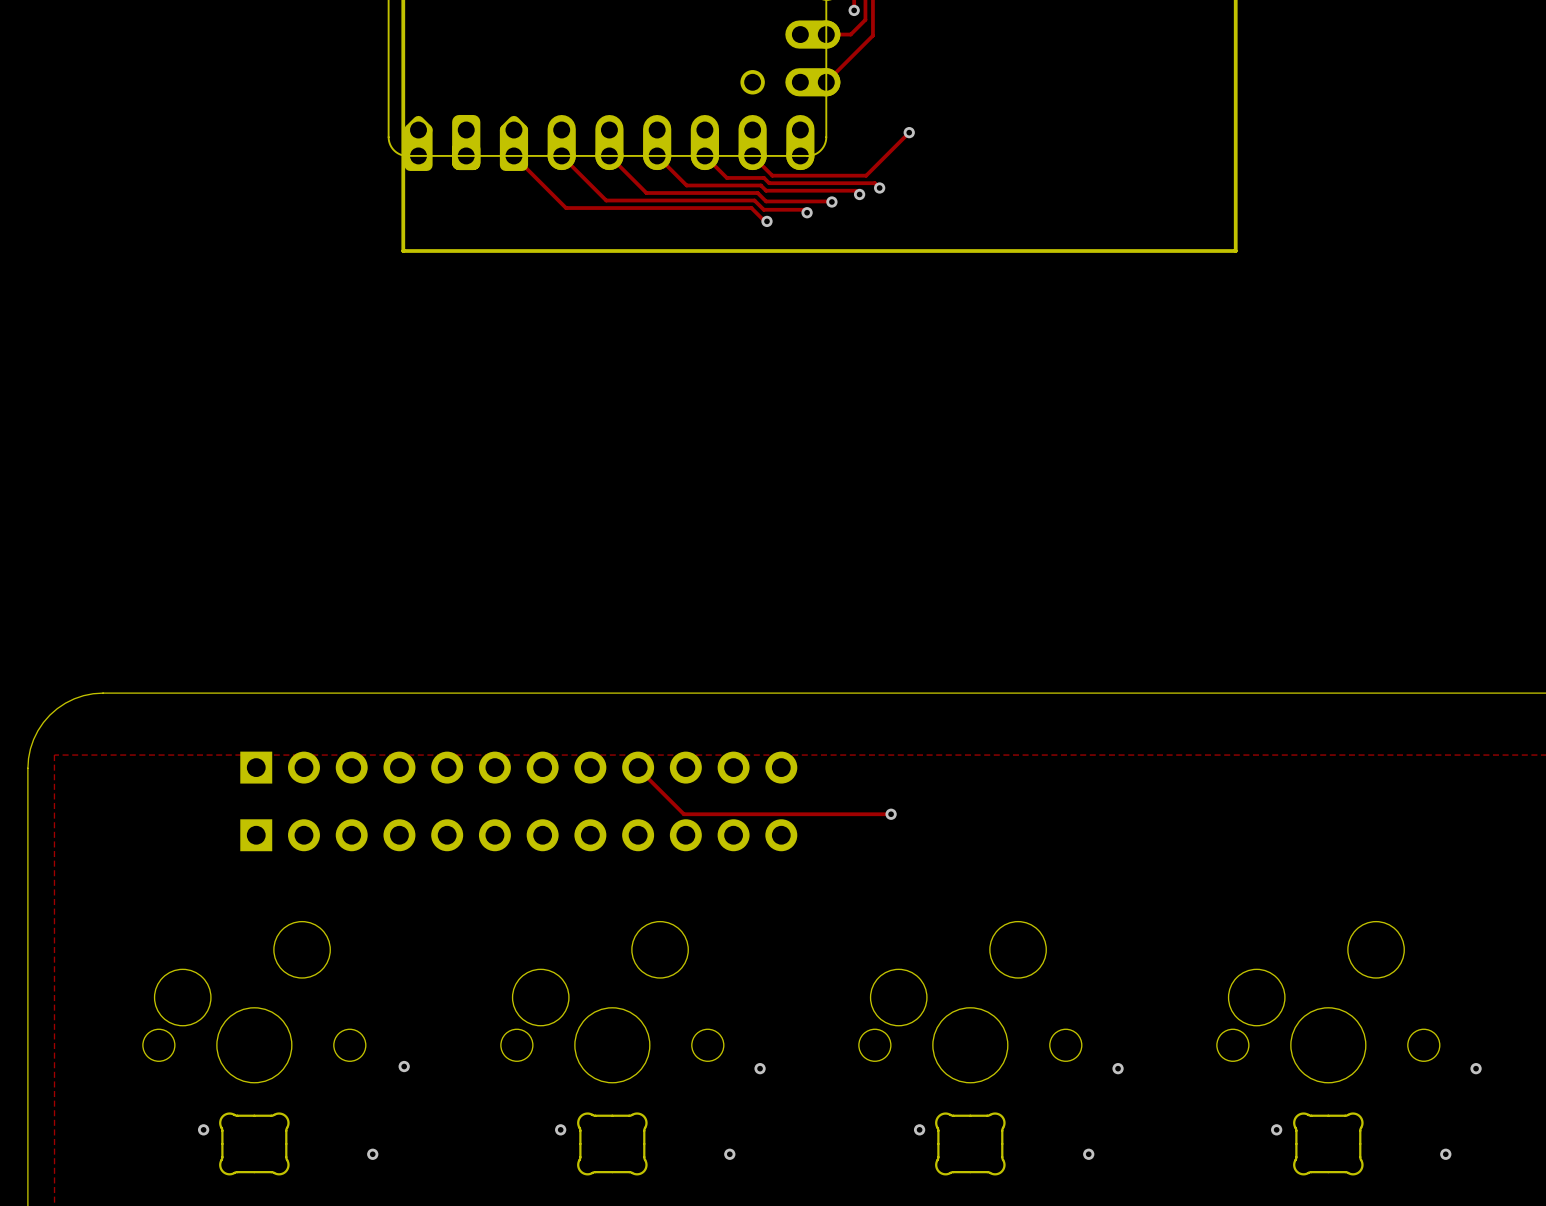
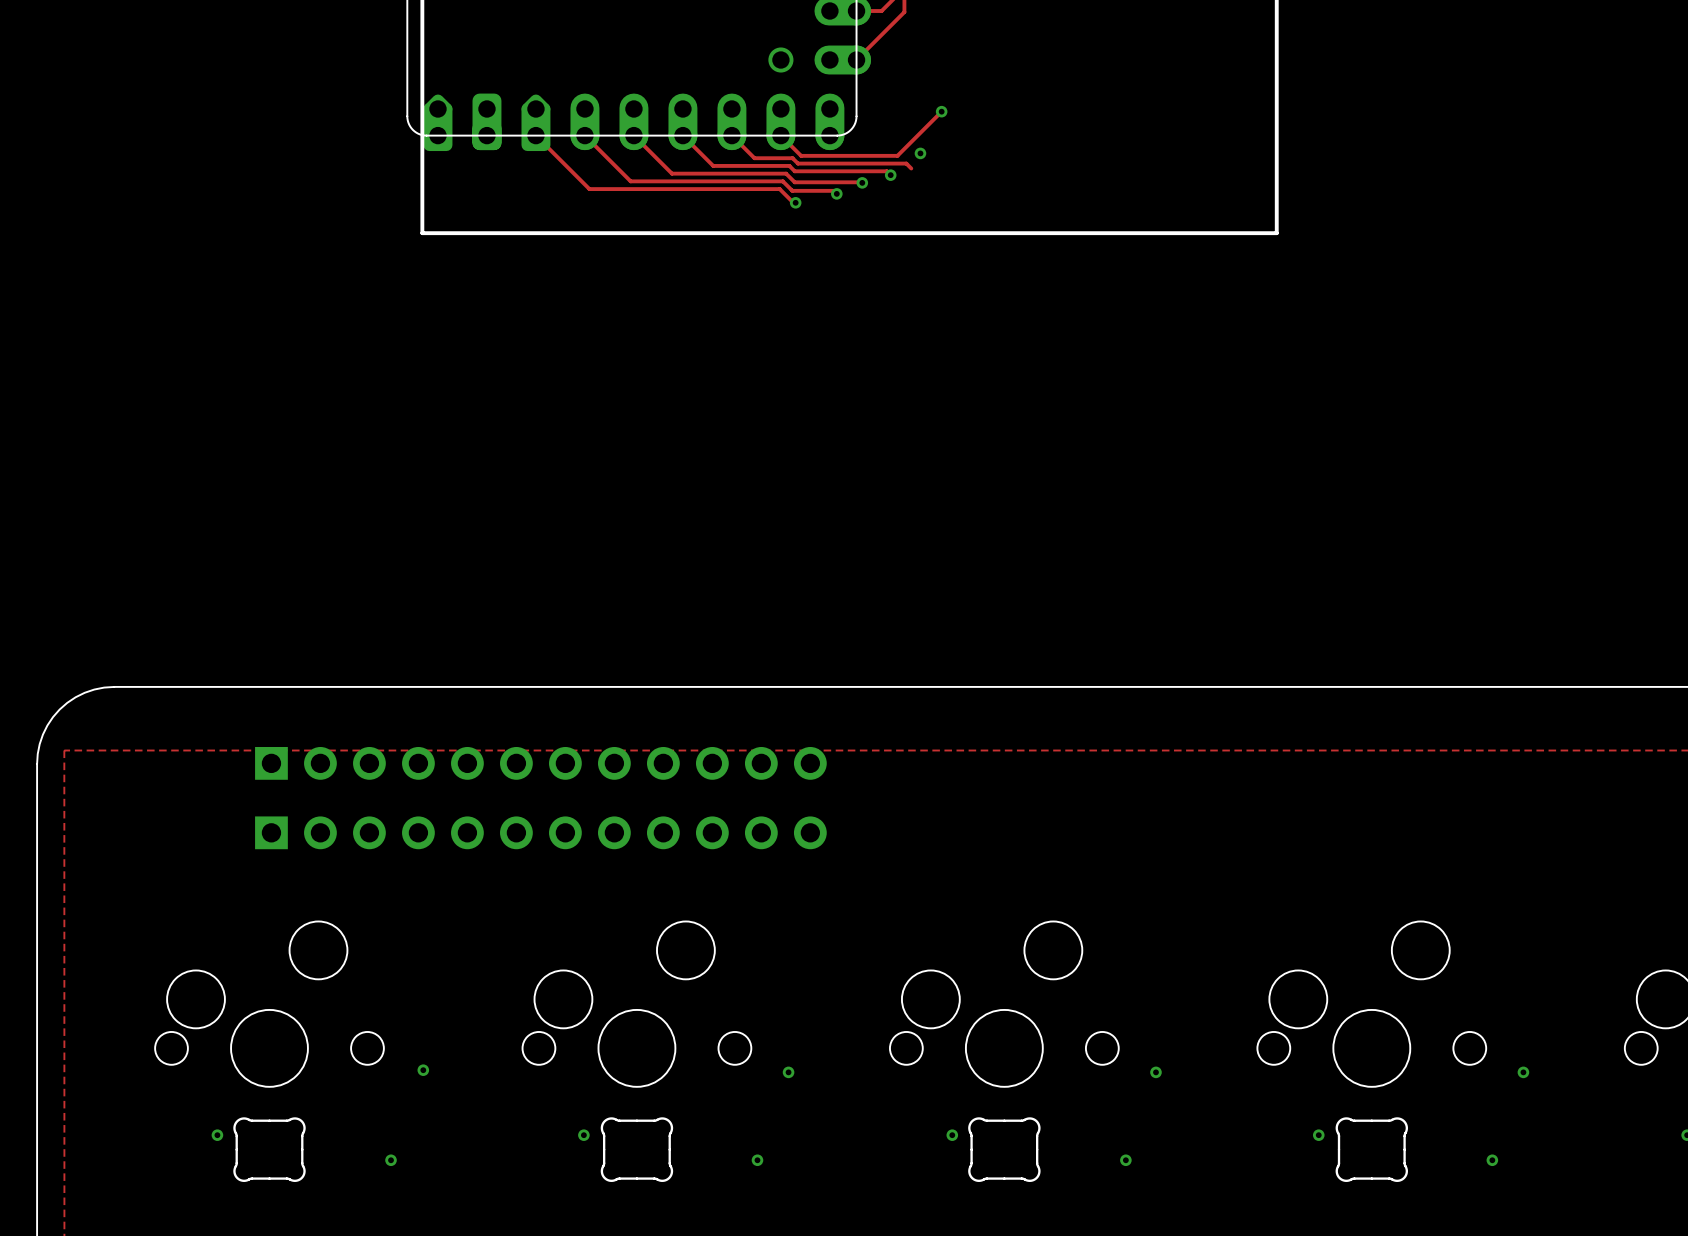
via position: (879, 187) -> (920, 153)
track: (638, 768) (683, 814) (891, 814) -> none
via: (891, 814) -> none

